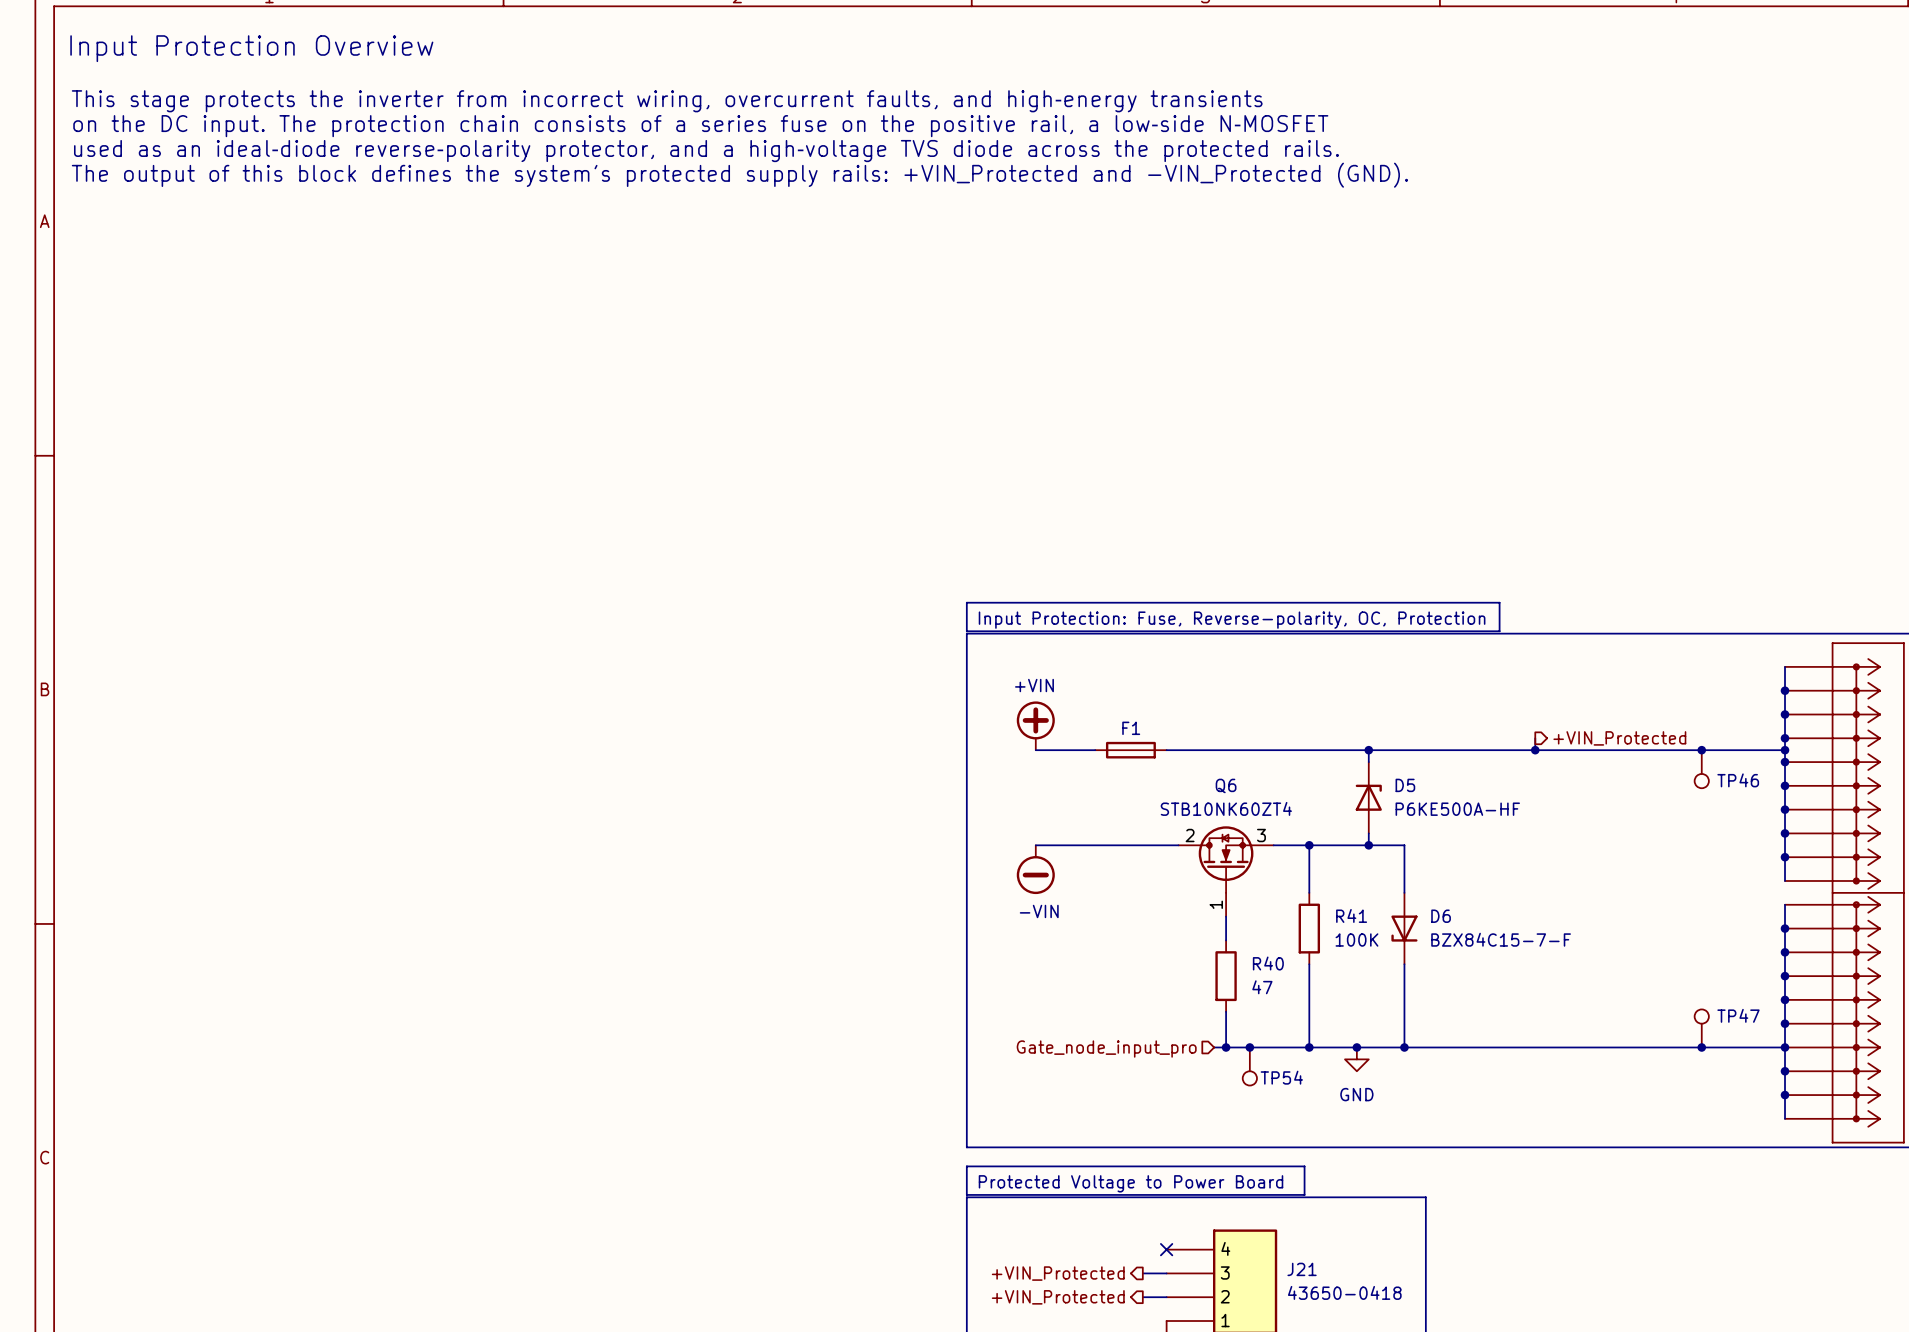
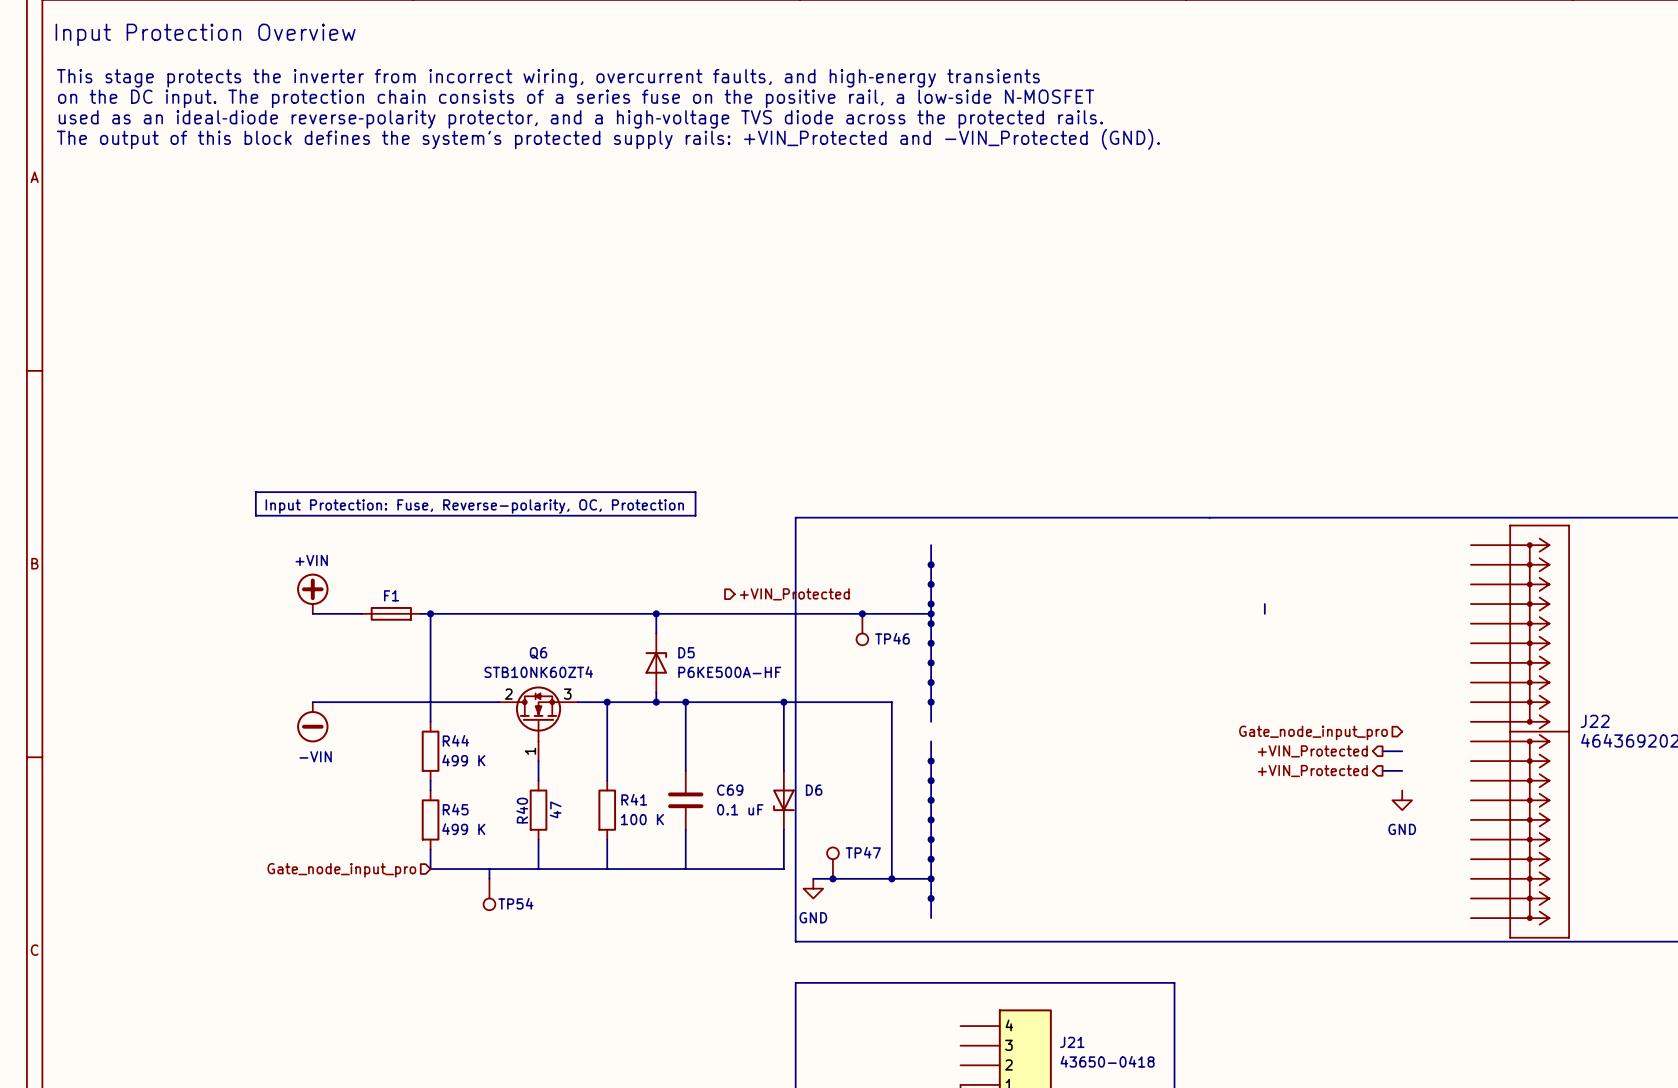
line: none -> (255, 492) (695, 492) (695, 515) (255, 515) (255, 492)
line: (966, 602) (966, 631) (1499, 631) (1499, 602) (966, 602) -> none
text: none -> Input Protection: Fuse, Reverse-polarity, OC, Protection (474, 506)
text: Input Protection: Fuse, Reverse-polarity, OC, Protection (1232, 620) -> none
wire: none -> (931, 545) (931, 721)
wire: (1785, 666) (1785, 880) -> none
junction: none -> (931, 564)
junction: (1785, 690) -> none
junction: none -> (931, 584)
junction: (1785, 714) -> none
power symbol: none -> +VIN (312, 593)
power symbol: +VIN (1035, 725) -> none
hierarchical label: none -> +VIN_Protected (794, 594)
junction: none -> (931, 604)
hierarchical label: +VIN_Protected (1619, 738) -> none
junction: (1785, 738) -> none
wire: none -> (312, 613) (361, 613)
wire: none -> (420, 613) (852, 613)
wire: none -> (430, 613) (430, 721)
junction: none -> (430, 613)
wire: none -> (656, 613) (656, 633)
junction: none -> (656, 613)
junction: none -> (862, 613)
junction: none -> (931, 613)
F1 position: (1130, 750) -> (391, 613)
wire: (1166, 750) (1785, 750) -> none
wire: (1368, 750) (1368, 762) -> none
junction: (1368, 750) -> none
junction: (1535, 750) -> none
junction: (1701, 750) -> none
junction: (1785, 750) -> none
junction: none -> (931, 623)
junction: (1785, 762) -> none
TP46 position: (1701, 769) -> (862, 629)
junction: none -> (931, 643)
junction: (1785, 785) -> none
D5 position: (1368, 797) -> (656, 662)
junction: none -> (931, 662)
junction: (1785, 809) -> none
junction: none -> (931, 682)
wire: (1368, 833) (1368, 845) -> none
junction: (1785, 833) -> none
wire: none -> (656, 692) (656, 702)
wire: (1035, 845) (1178, 845) -> (813, 878) (931, 878)
wire: (1273, 845) (1404, 845) (1404, 892) -> none
wire: (1309, 845) (1309, 892) -> none
junction: (1309, 845) -> none
junction: (1368, 845) -> none
wire: none -> (312, 702) (499, 702)
wire: none -> (577, 702) (891, 702) (891, 878)
wire: none -> (607, 702) (607, 780)
junction: none -> (607, 702)
junction: none -> (656, 702)
wire: none -> (685, 702) (685, 770)
junction: none -> (685, 702)
wire: none -> (783, 702) (783, 770)
junction: none -> (783, 702)
junction: none -> (931, 702)
junction: (1785, 857) -> none
power symbol: -VIN (1035, 869) -> none
Q6 position: (1226, 871) -> (538, 723)
power symbol: none -> -VIN (312, 722)
hierarchical label: none -> Gate_node_input_pro (1313, 732)
wire: none -> (931, 741) (931, 918)
wire: (1785, 904) (1785, 1118) -> none
R41 name position: R41 (1351, 915) -> R41 (634, 799)
R44: none -> 499 K (430, 751)
wire: (1226, 916) (1226, 940) -> none
hierarchical label: none -> +VIN_Protected (1312, 751)
wire: none -> (1382, 751) (1402, 751)
wire: none -> (538, 761) (538, 780)
junction: none -> (931, 761)
R41 position: (1309, 928) -> (607, 810)
D6 position: (1404, 928) -> (783, 800)
junction: (1785, 928) -> none
D6 value: BZX84C15-7-F (1501, 939) -> none
R41 value: 100K (1356, 940) -> 100 K (642, 819)
hierarchical label: none -> +VIN_Protected (1312, 770)
wire: none -> (1382, 770) (1402, 770)
wire: none -> (430, 780) (430, 790)
junction: none -> (931, 780)
junction: (1785, 952) -> none
R40 name rotation: 0° (1268, 963) -> 90° counterclockwise (522, 810)
R40 name position: R40 (1268, 963) -> R40 (522, 810)
wire: (1309, 964) (1309, 1047) -> none
wire: (1404, 964) (1404, 1047) -> none
C69: none -> 0.1 uF (685, 800)
junction: none -> (931, 800)
R40 position: (1226, 976) -> (538, 810)
power symbol: none -> GND (1402, 800)
junction: (1785, 976) -> none
R40 value rotation: 0° (1262, 987) -> 90° counterclockwise (555, 809)
R45: none -> 499 K (430, 819)
junction: none -> (931, 819)
junction: (1785, 999) -> none
wire: none -> (685, 829) (685, 869)
wire: none -> (783, 829) (783, 869) (430, 869) (430, 849)
wire: (1226, 1011) (1226, 1047) -> none
wire: none -> (538, 839) (538, 869)
wire: none -> (607, 839) (607, 869)
junction: none -> (931, 839)
junction: (1785, 1023) -> none
TP47 position: (1701, 1028) -> (832, 863)
junction: none -> (931, 859)
wire: (1214, 1047) (1785, 1047) -> none
junction: (1226, 1047) -> none
junction: (1249, 1047) -> none
junction: (1309, 1047) -> none
junction: (1356, 1047) -> none
junction: (1404, 1047) -> none
junction: (1701, 1047) -> none
junction: (1785, 1047) -> none
hierarchical label: Gate_node_input_pro (1106, 1049) -> none
wire: none -> (489, 869) (489, 878)
power symbol: GND (1356, 1059) -> none
hierarchical label: none -> Gate_node_input_pro (341, 870)
TP54 position: (1249, 1066) -> (489, 894)
junction: none -> (832, 878)
junction: none -> (891, 878)
junction: none -> (931, 878)
junction: (1785, 1071) -> none
power symbol: none -> GND (813, 888)
junction: none -> (931, 898)
junction: (1785, 1095) -> none
line: (966, 1166) (966, 1194) (1304, 1194) (1304, 1166) (966, 1166) -> none
text: Protected Voltage to Power Board (1130, 1183) -> none
no-connect mark: (1166, 1249) -> none
hierarchical label: +VIN_Protected (1058, 1273) -> none
wire: (1142, 1273) (1166, 1273) -> none
hierarchical label: +VIN_Protected (1058, 1297) -> none
wire: (1142, 1297) (1166, 1297) -> none

